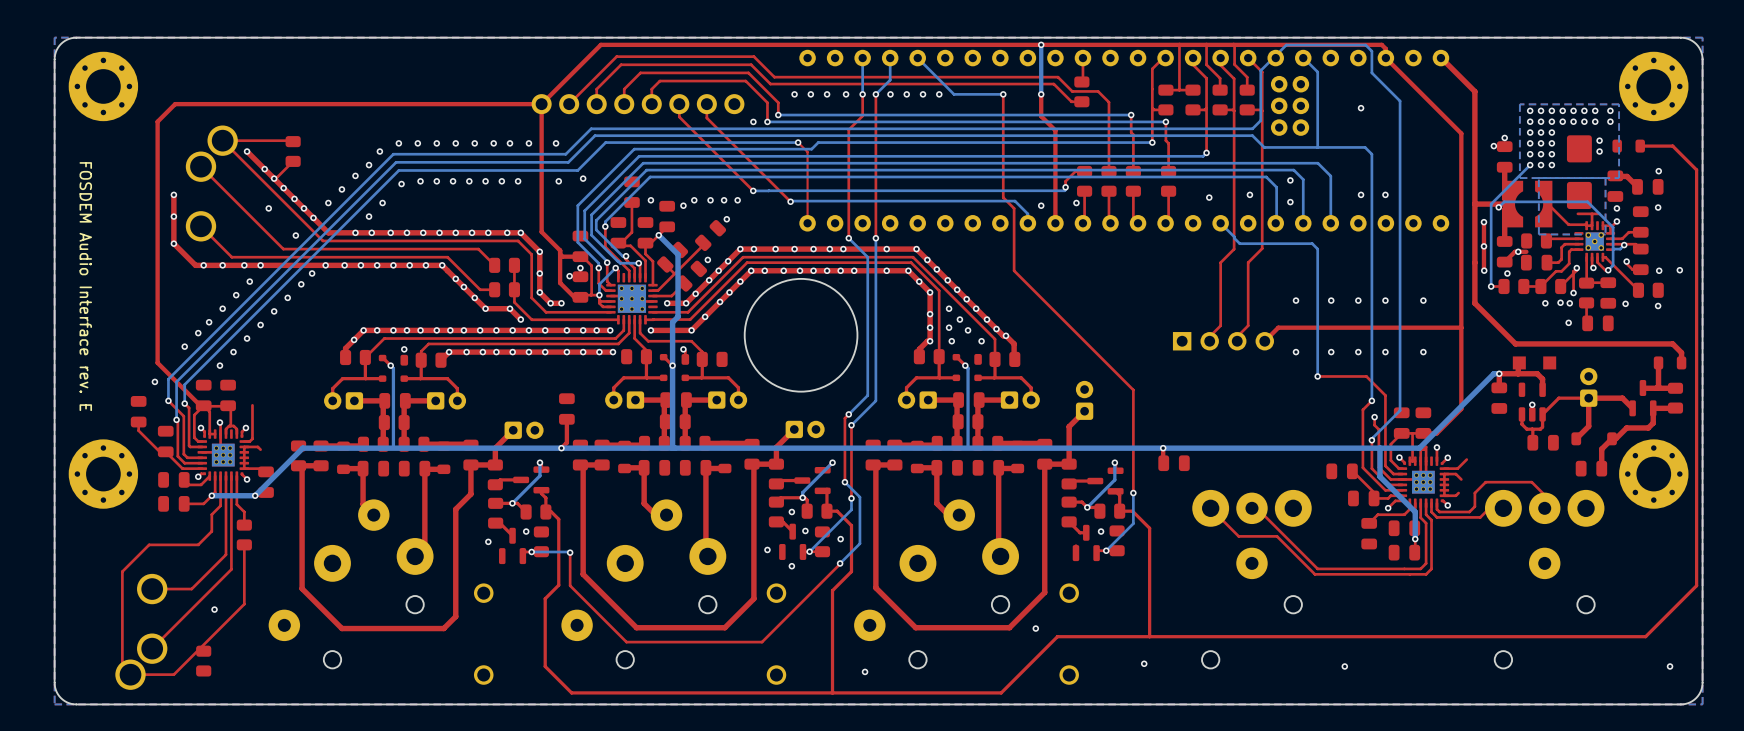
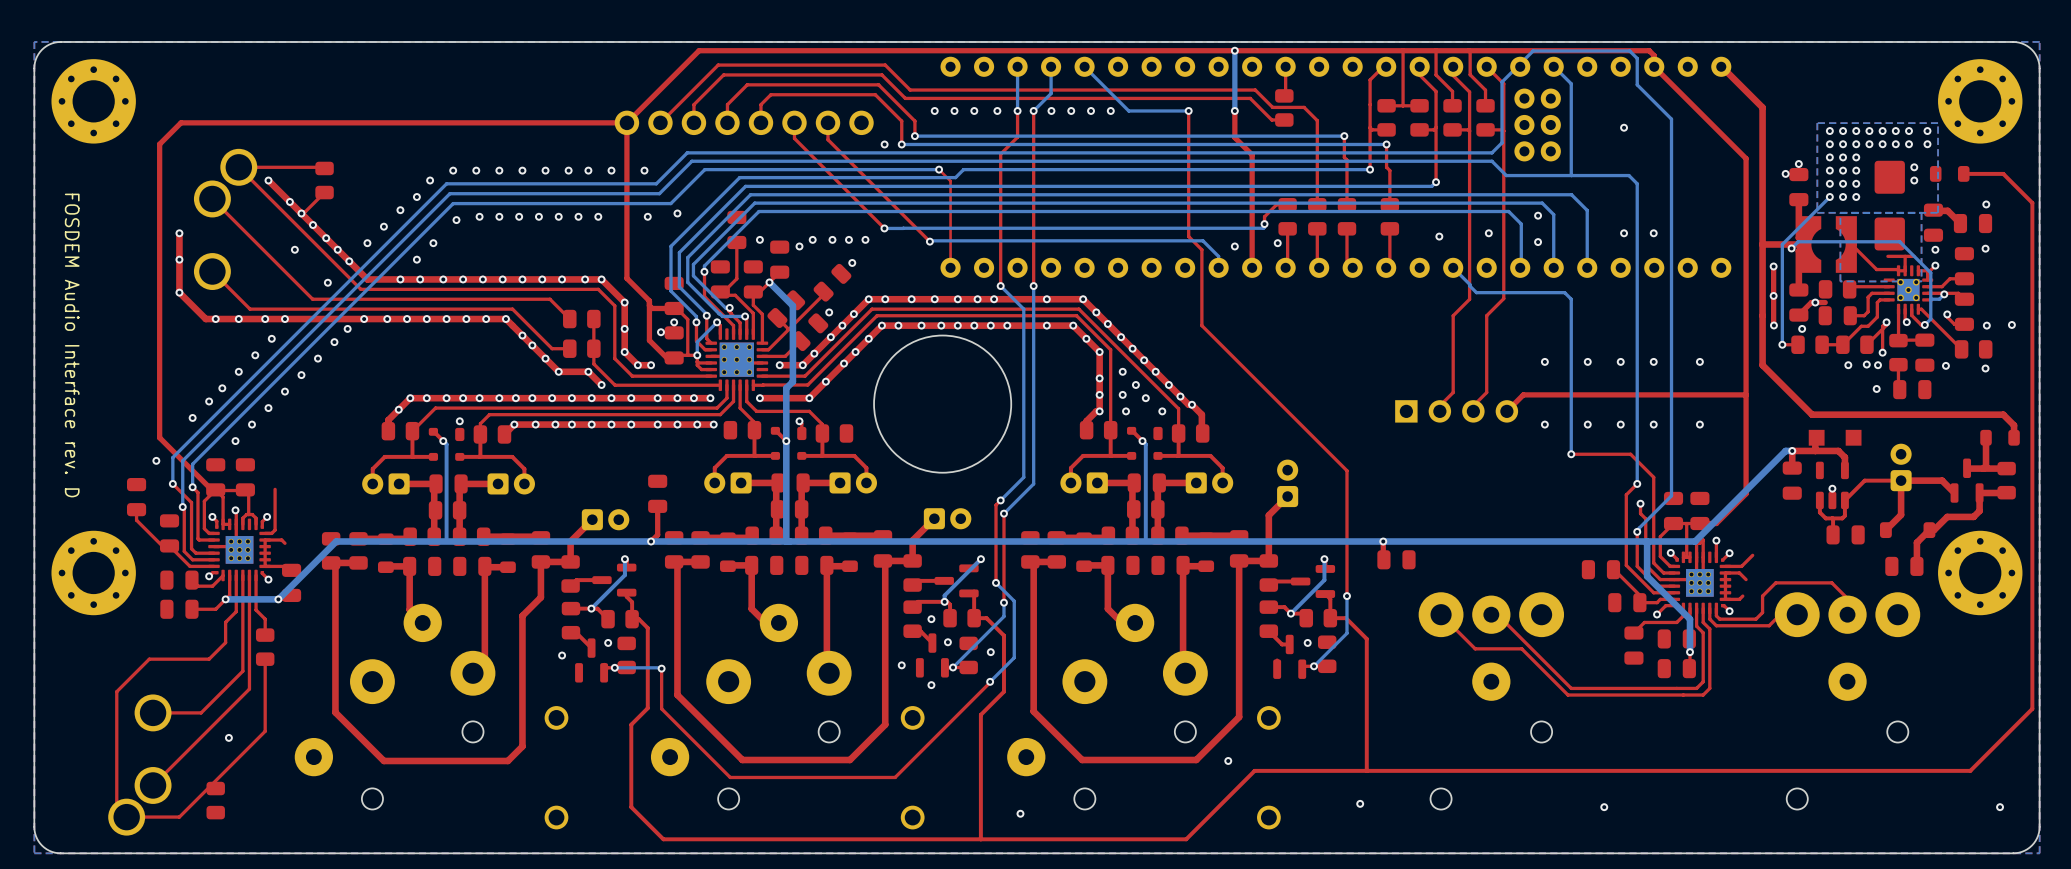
text: FOSDEM Audio Interface rev. E (85, 286) -> FOSDEM Audio Interface rev. D (72, 345)

